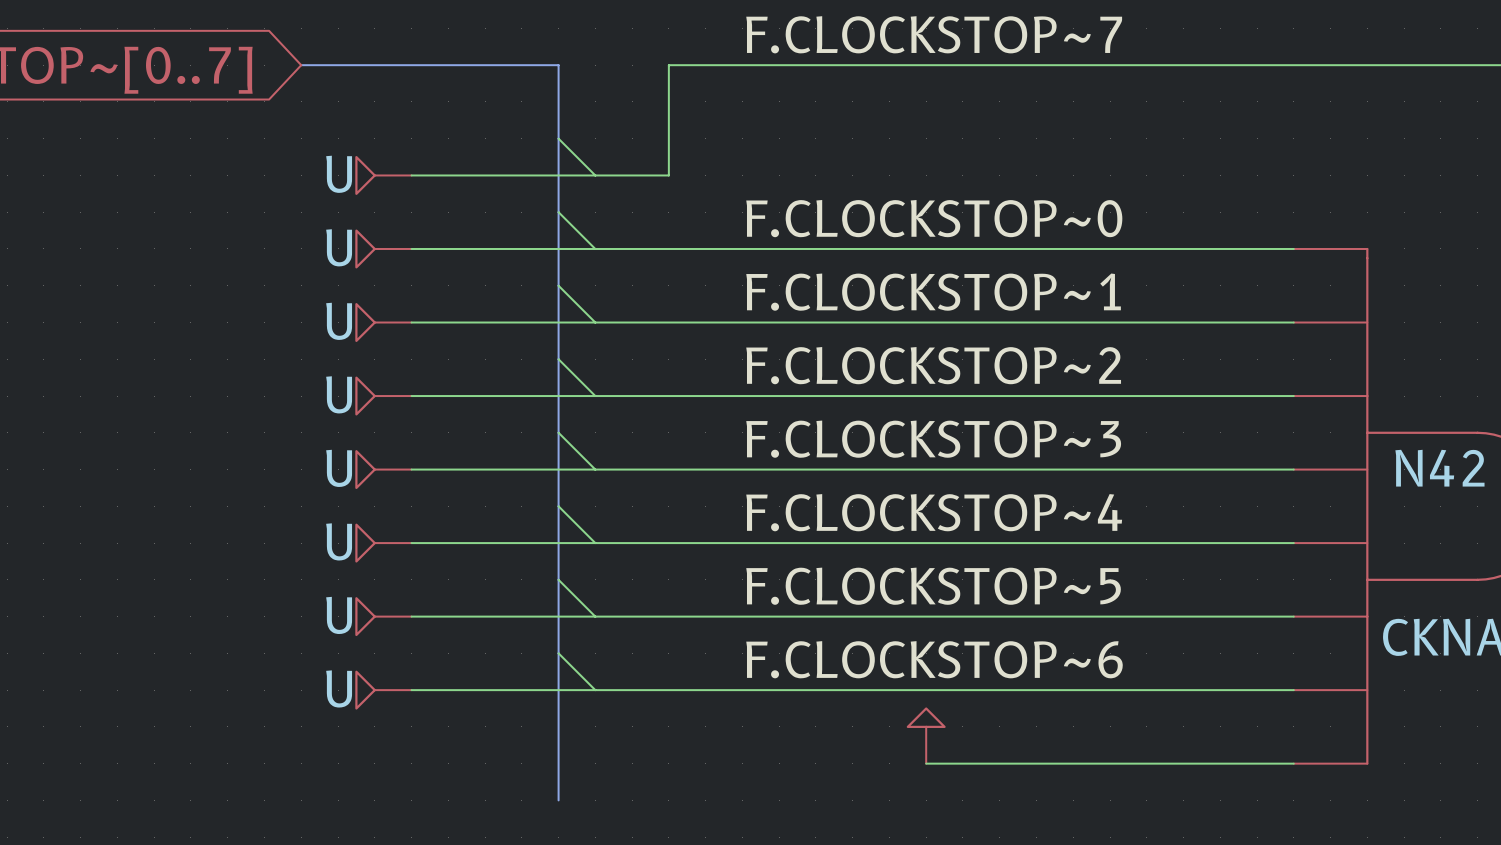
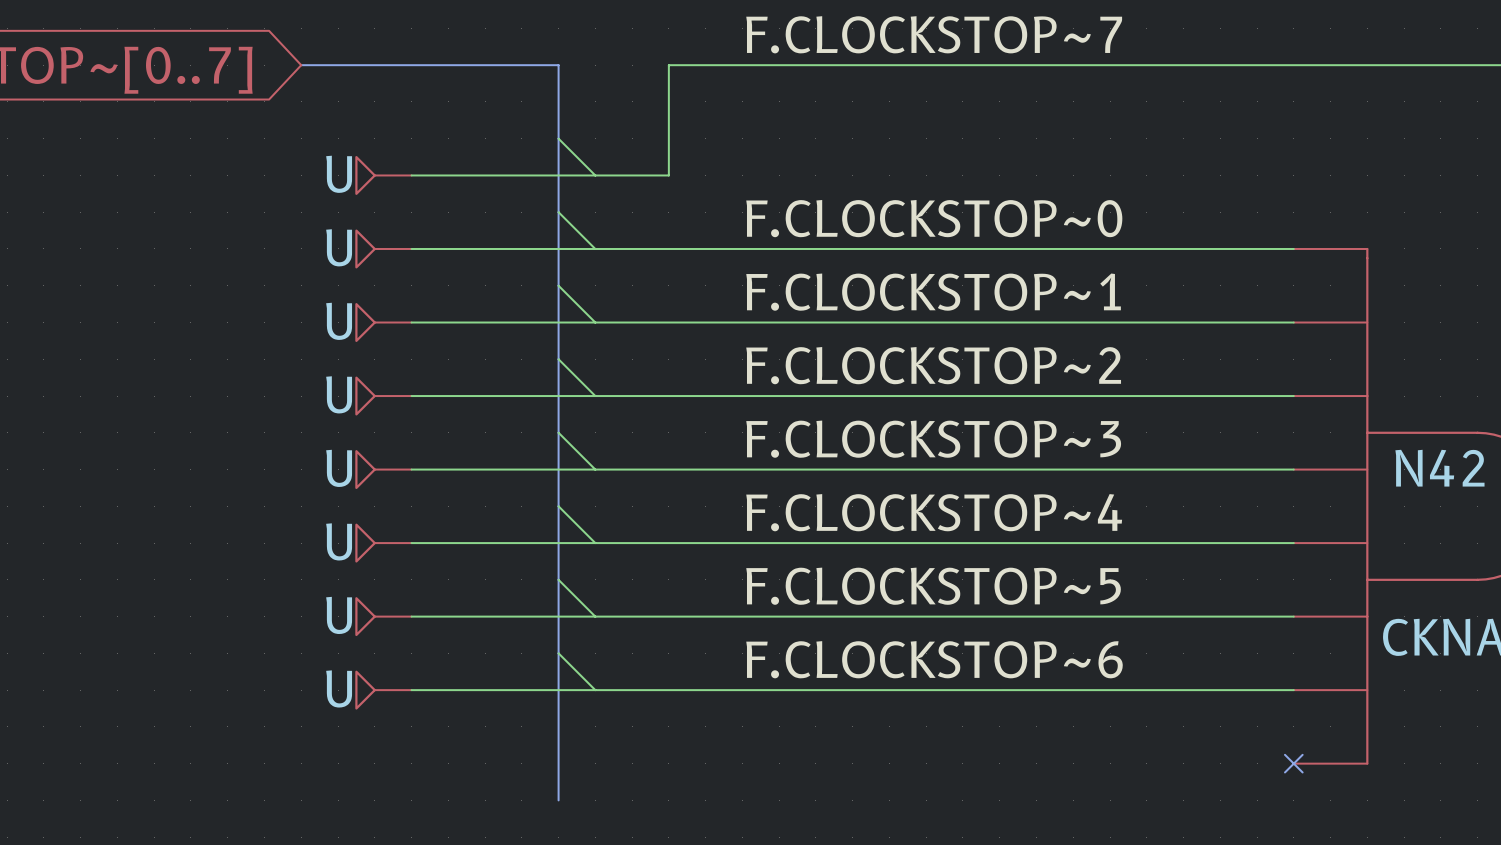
power symbol: (926, 735) -> none
wire: (926, 763) (1293, 763) -> none
no-connect mark: none -> (1293, 763)

